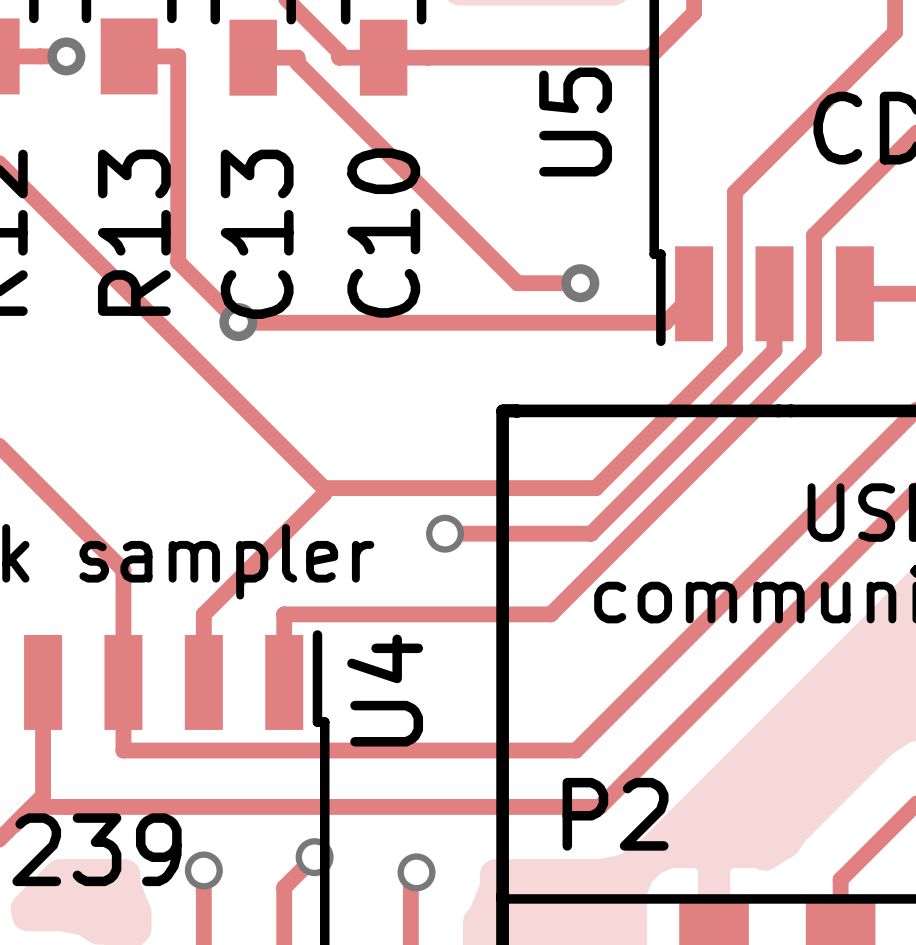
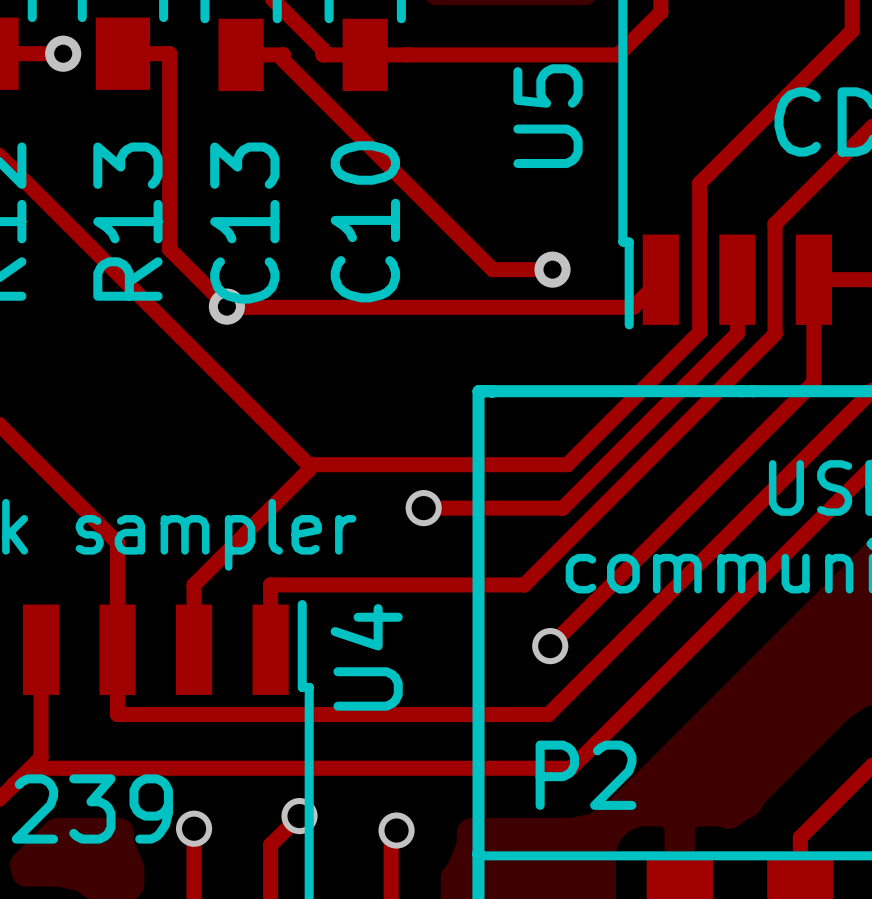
track: none -> (813, 279) (813, 382) (550, 646)
via: none -> (550, 646)

